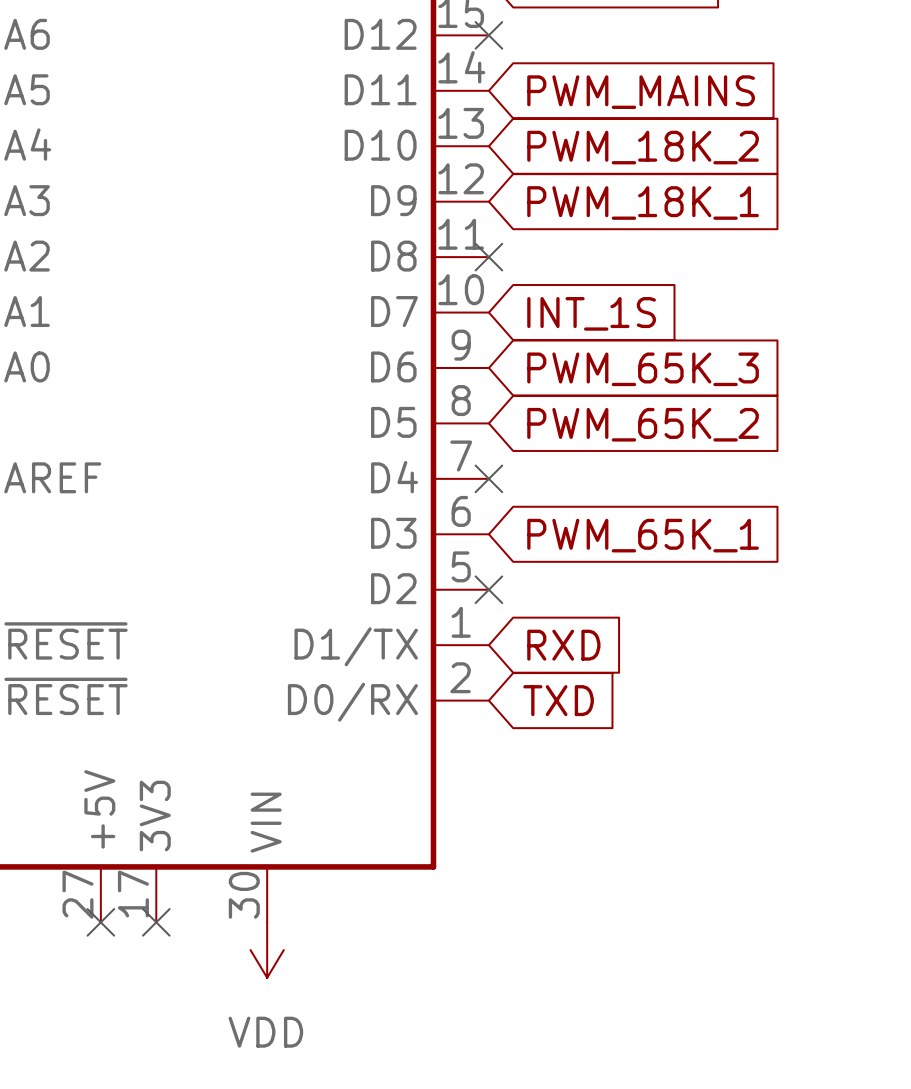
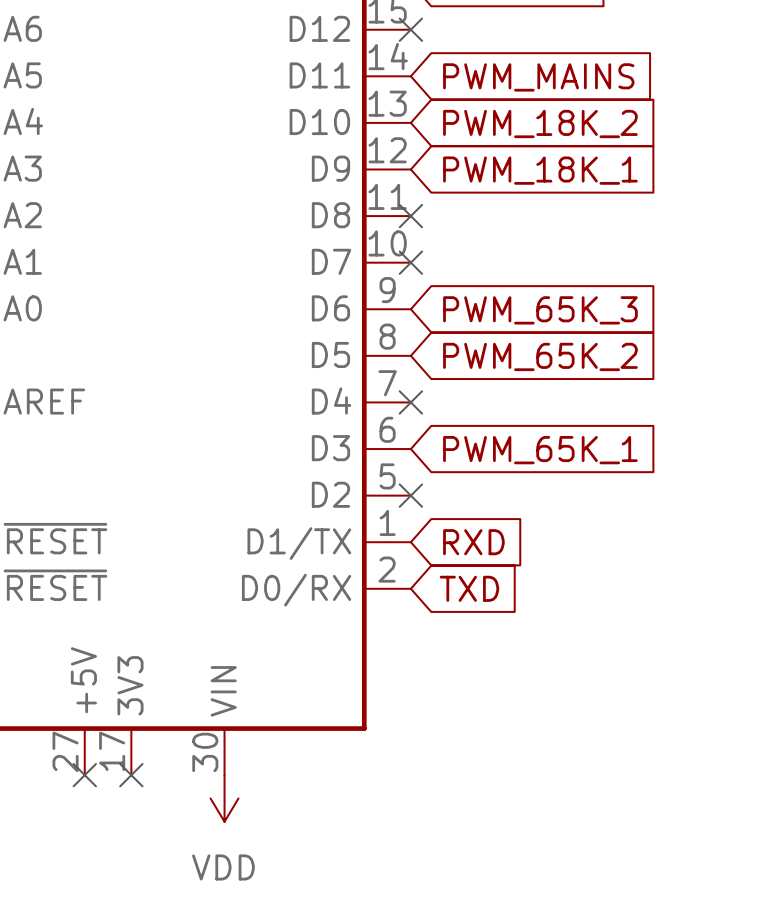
no-connect mark: none -> (410, 262)
global label: INT_1S (591, 313) -> none

